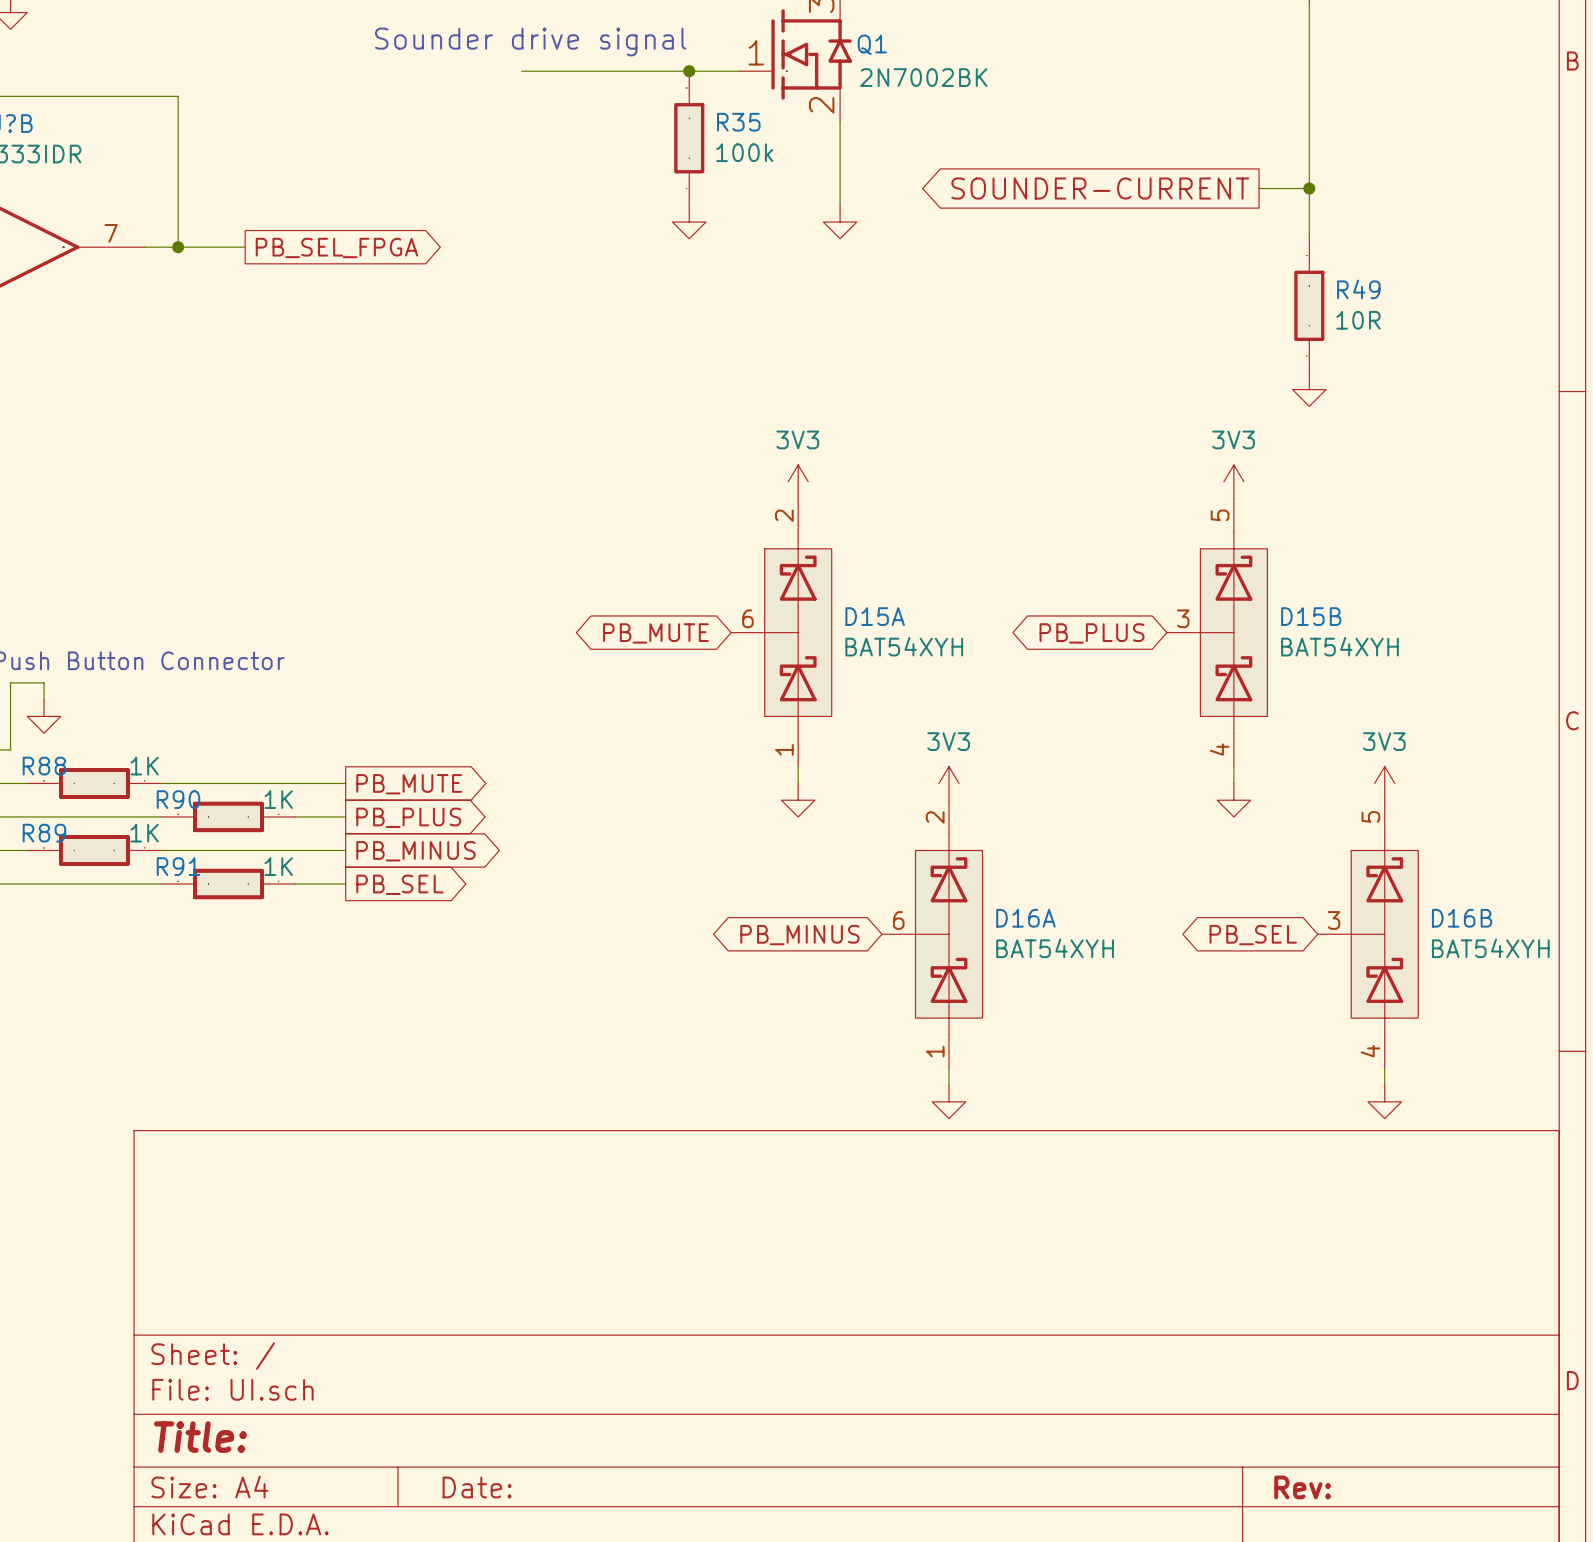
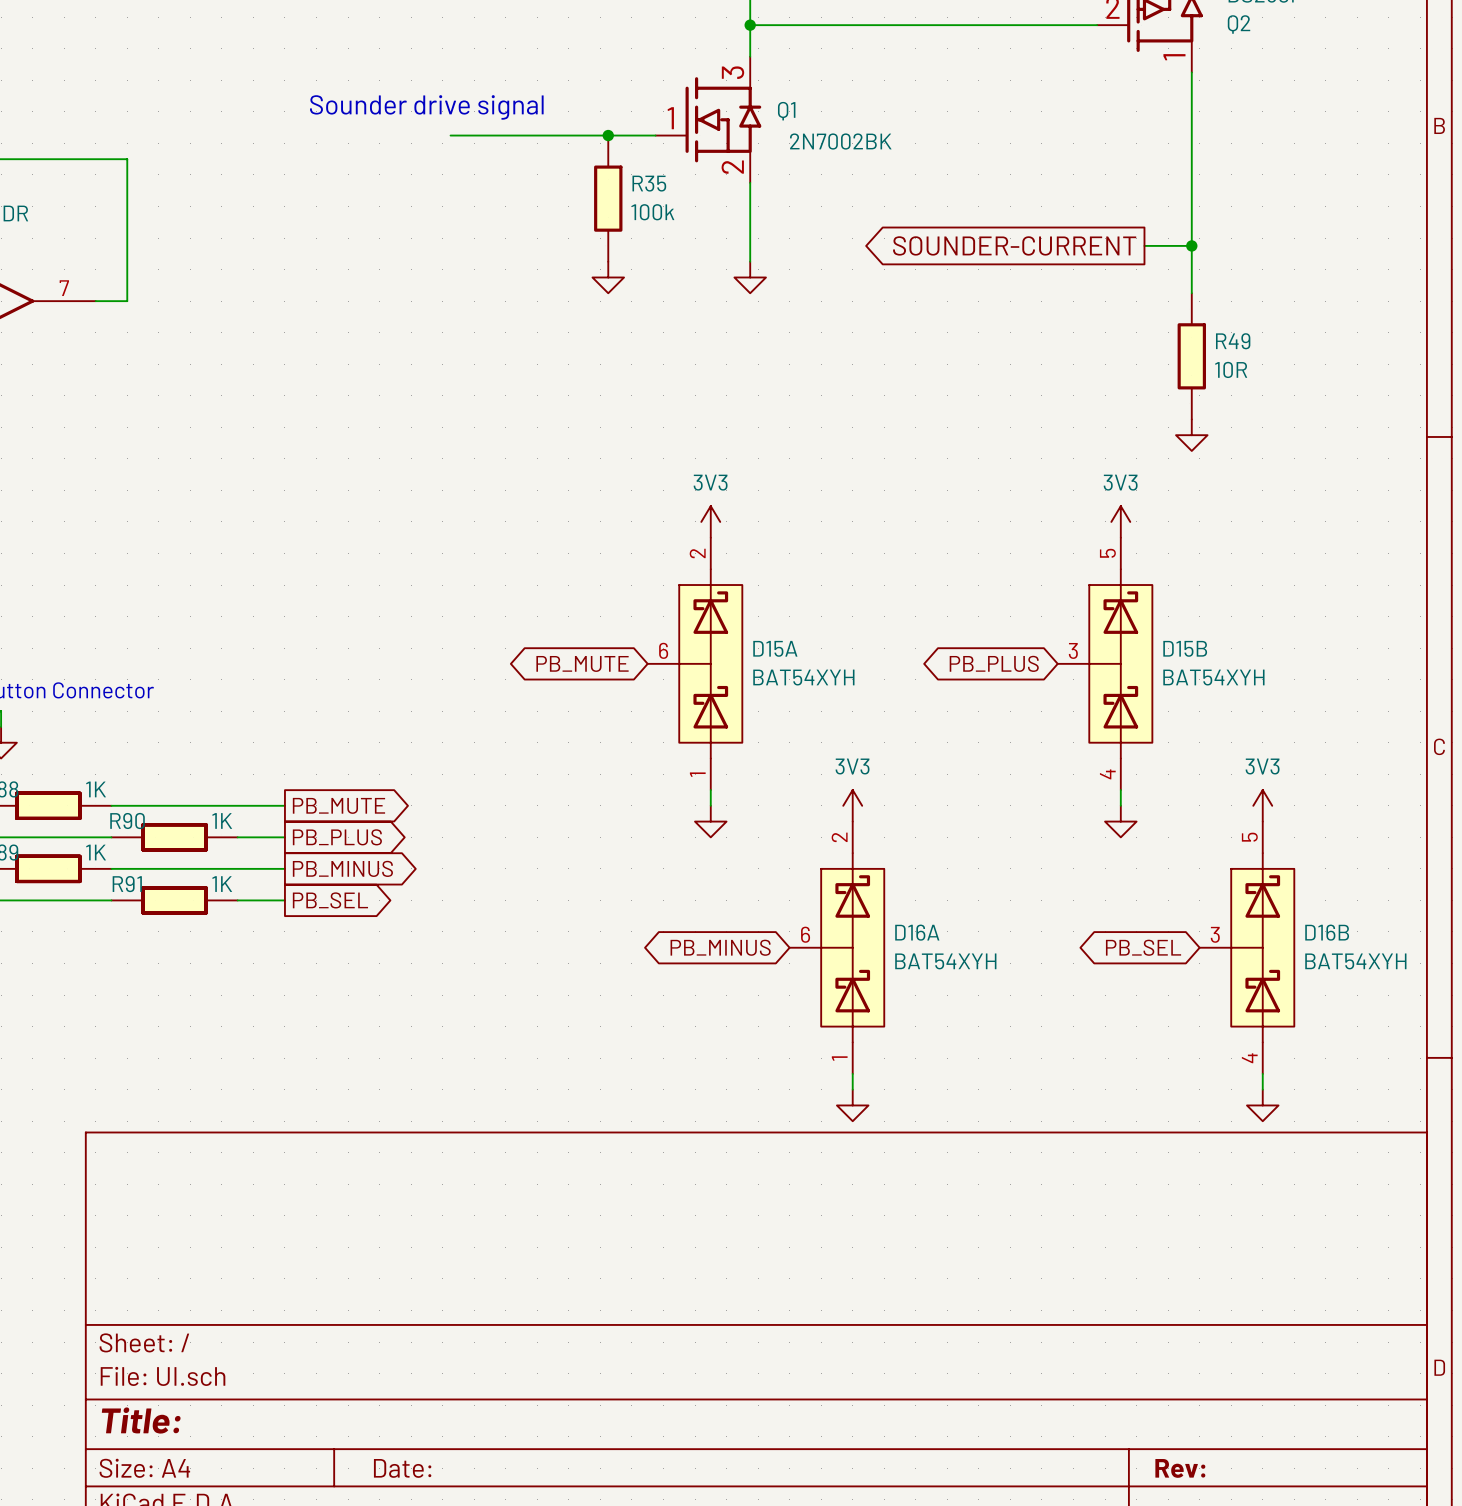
wire: (178, 247) (245, 247) -> none
junction: (178, 247) -> none
global label: PB_SEL_FPGA (336, 247) -> none

